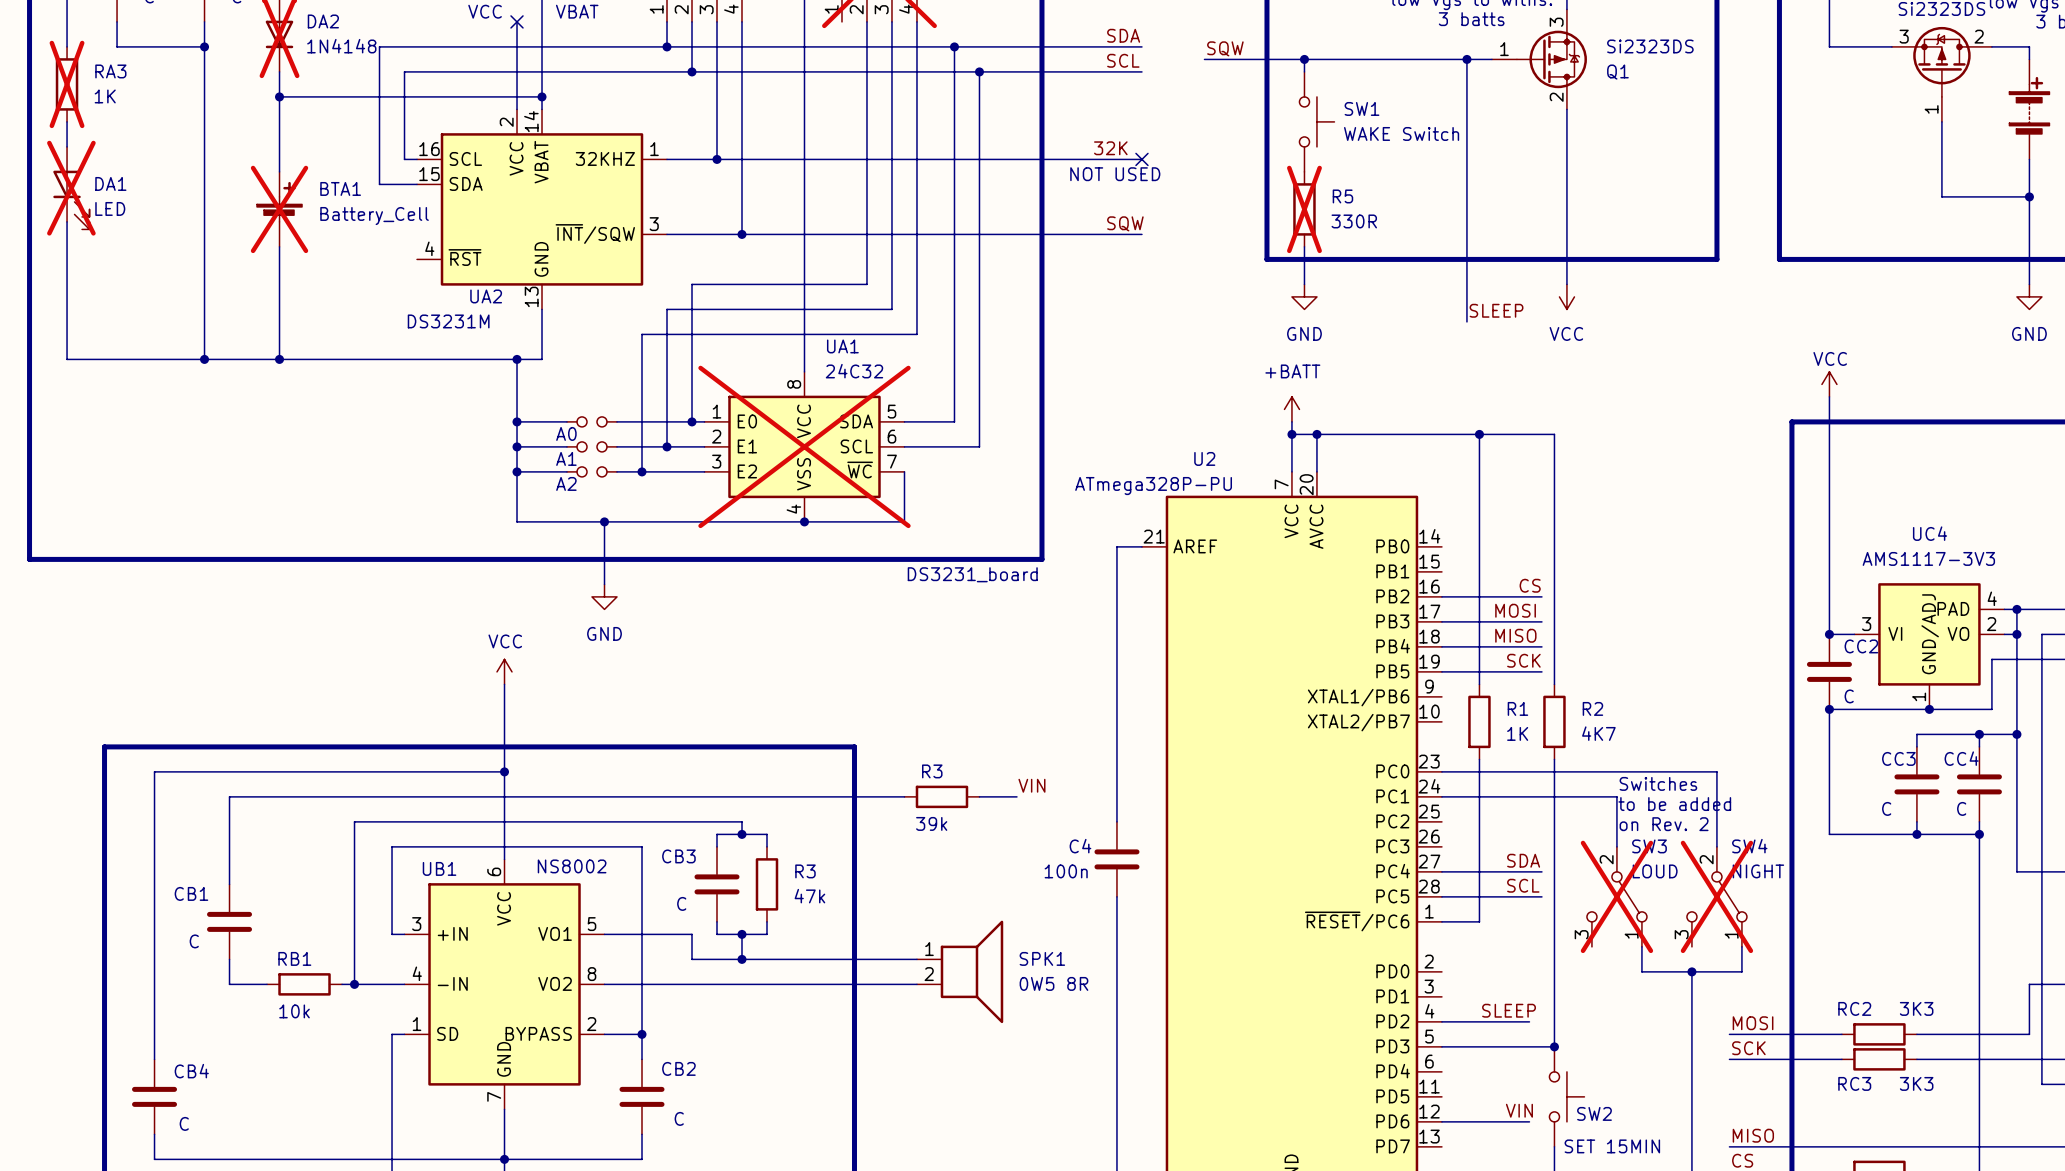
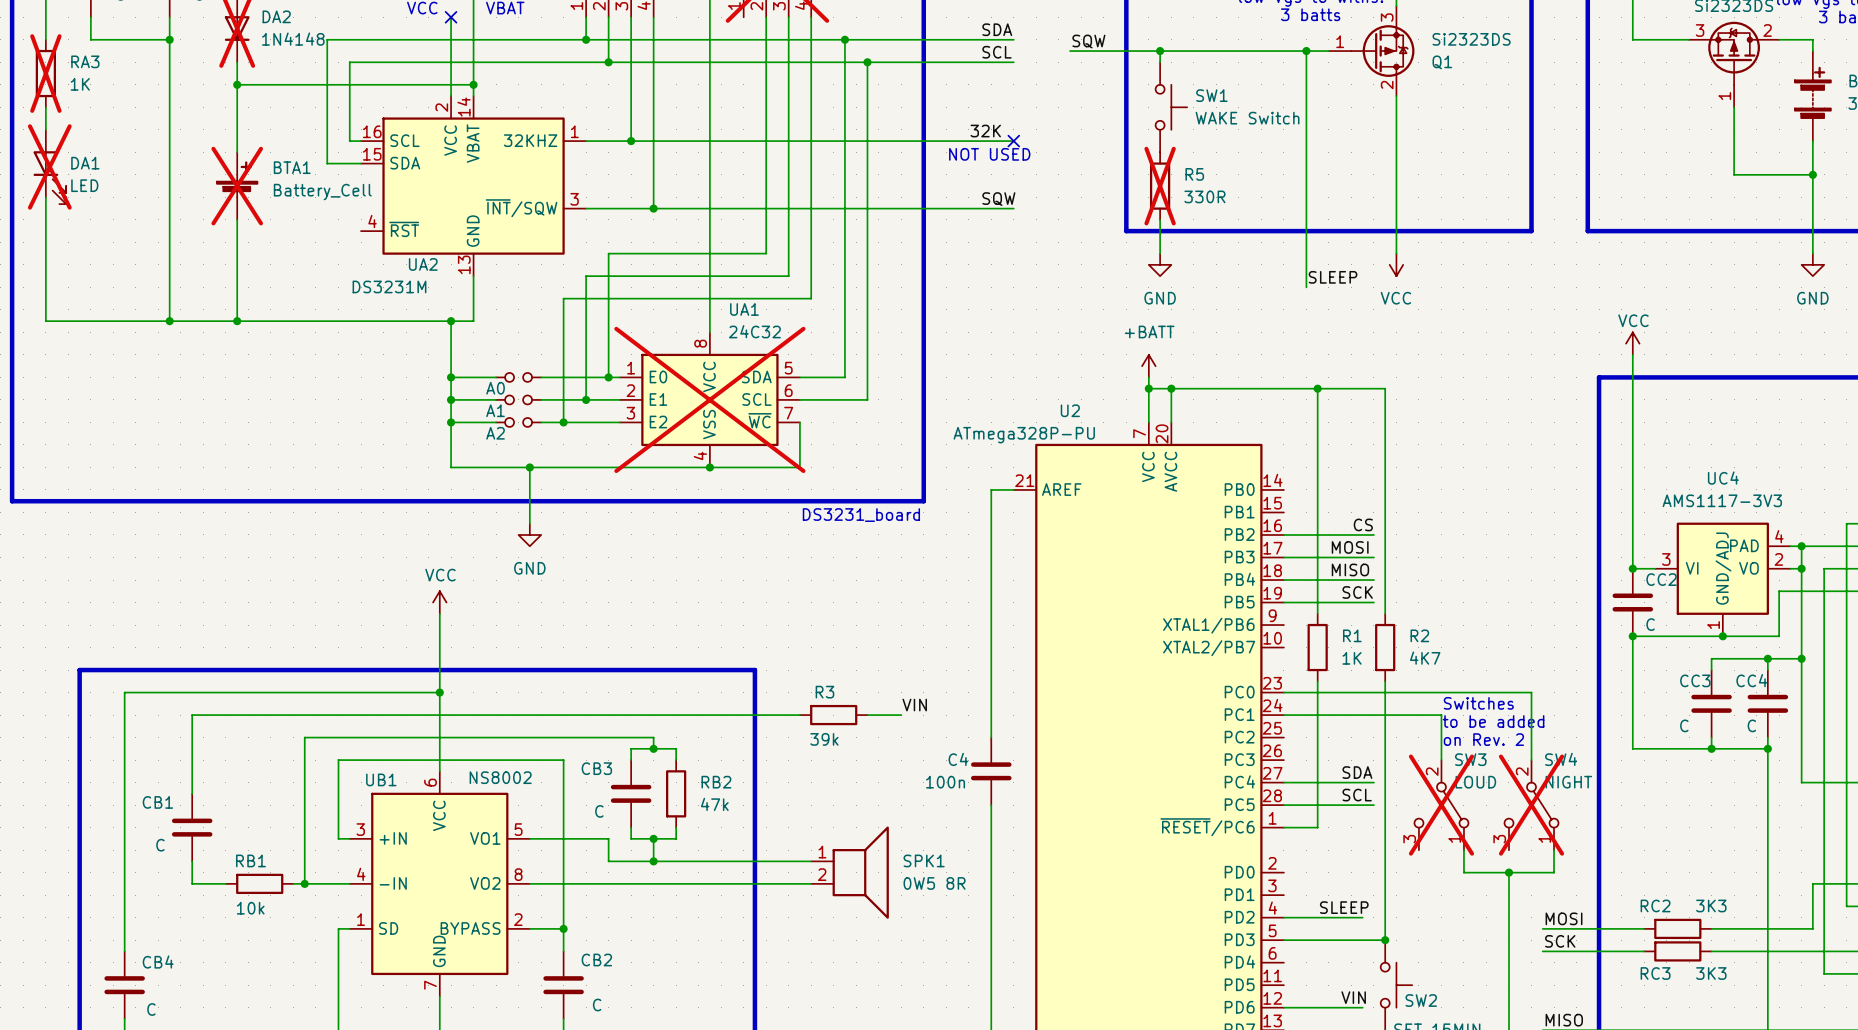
R3 name: R3 (805, 871) -> RB2 (716, 782)

